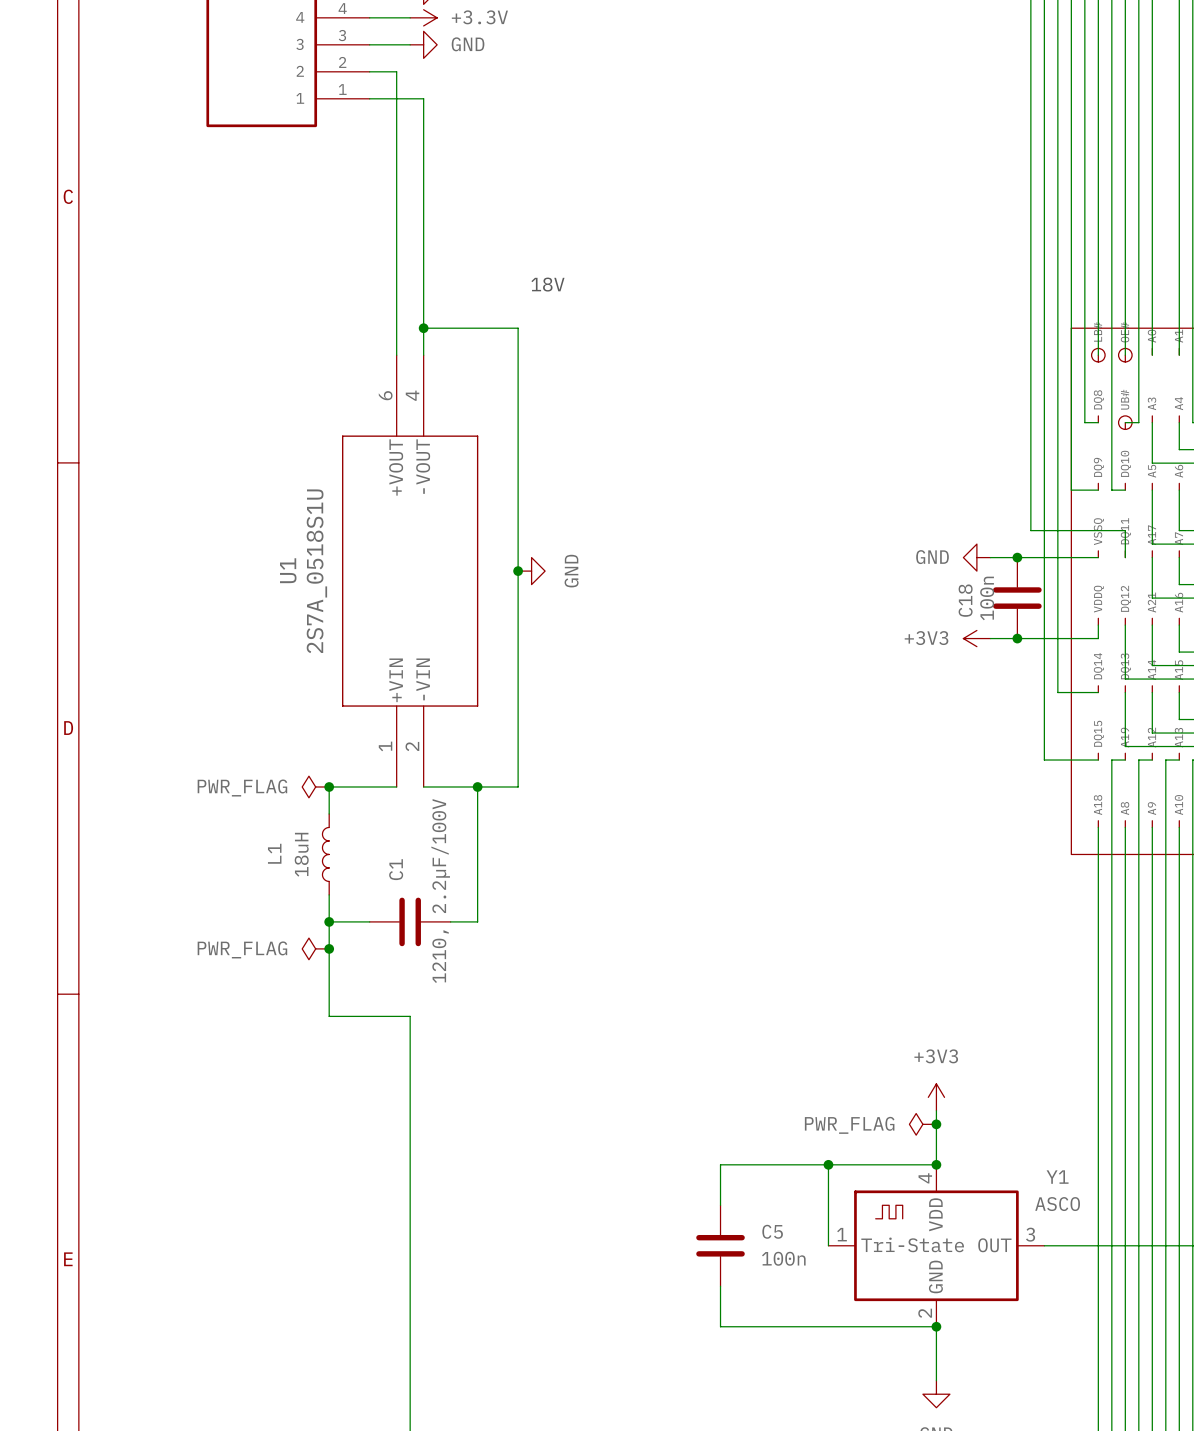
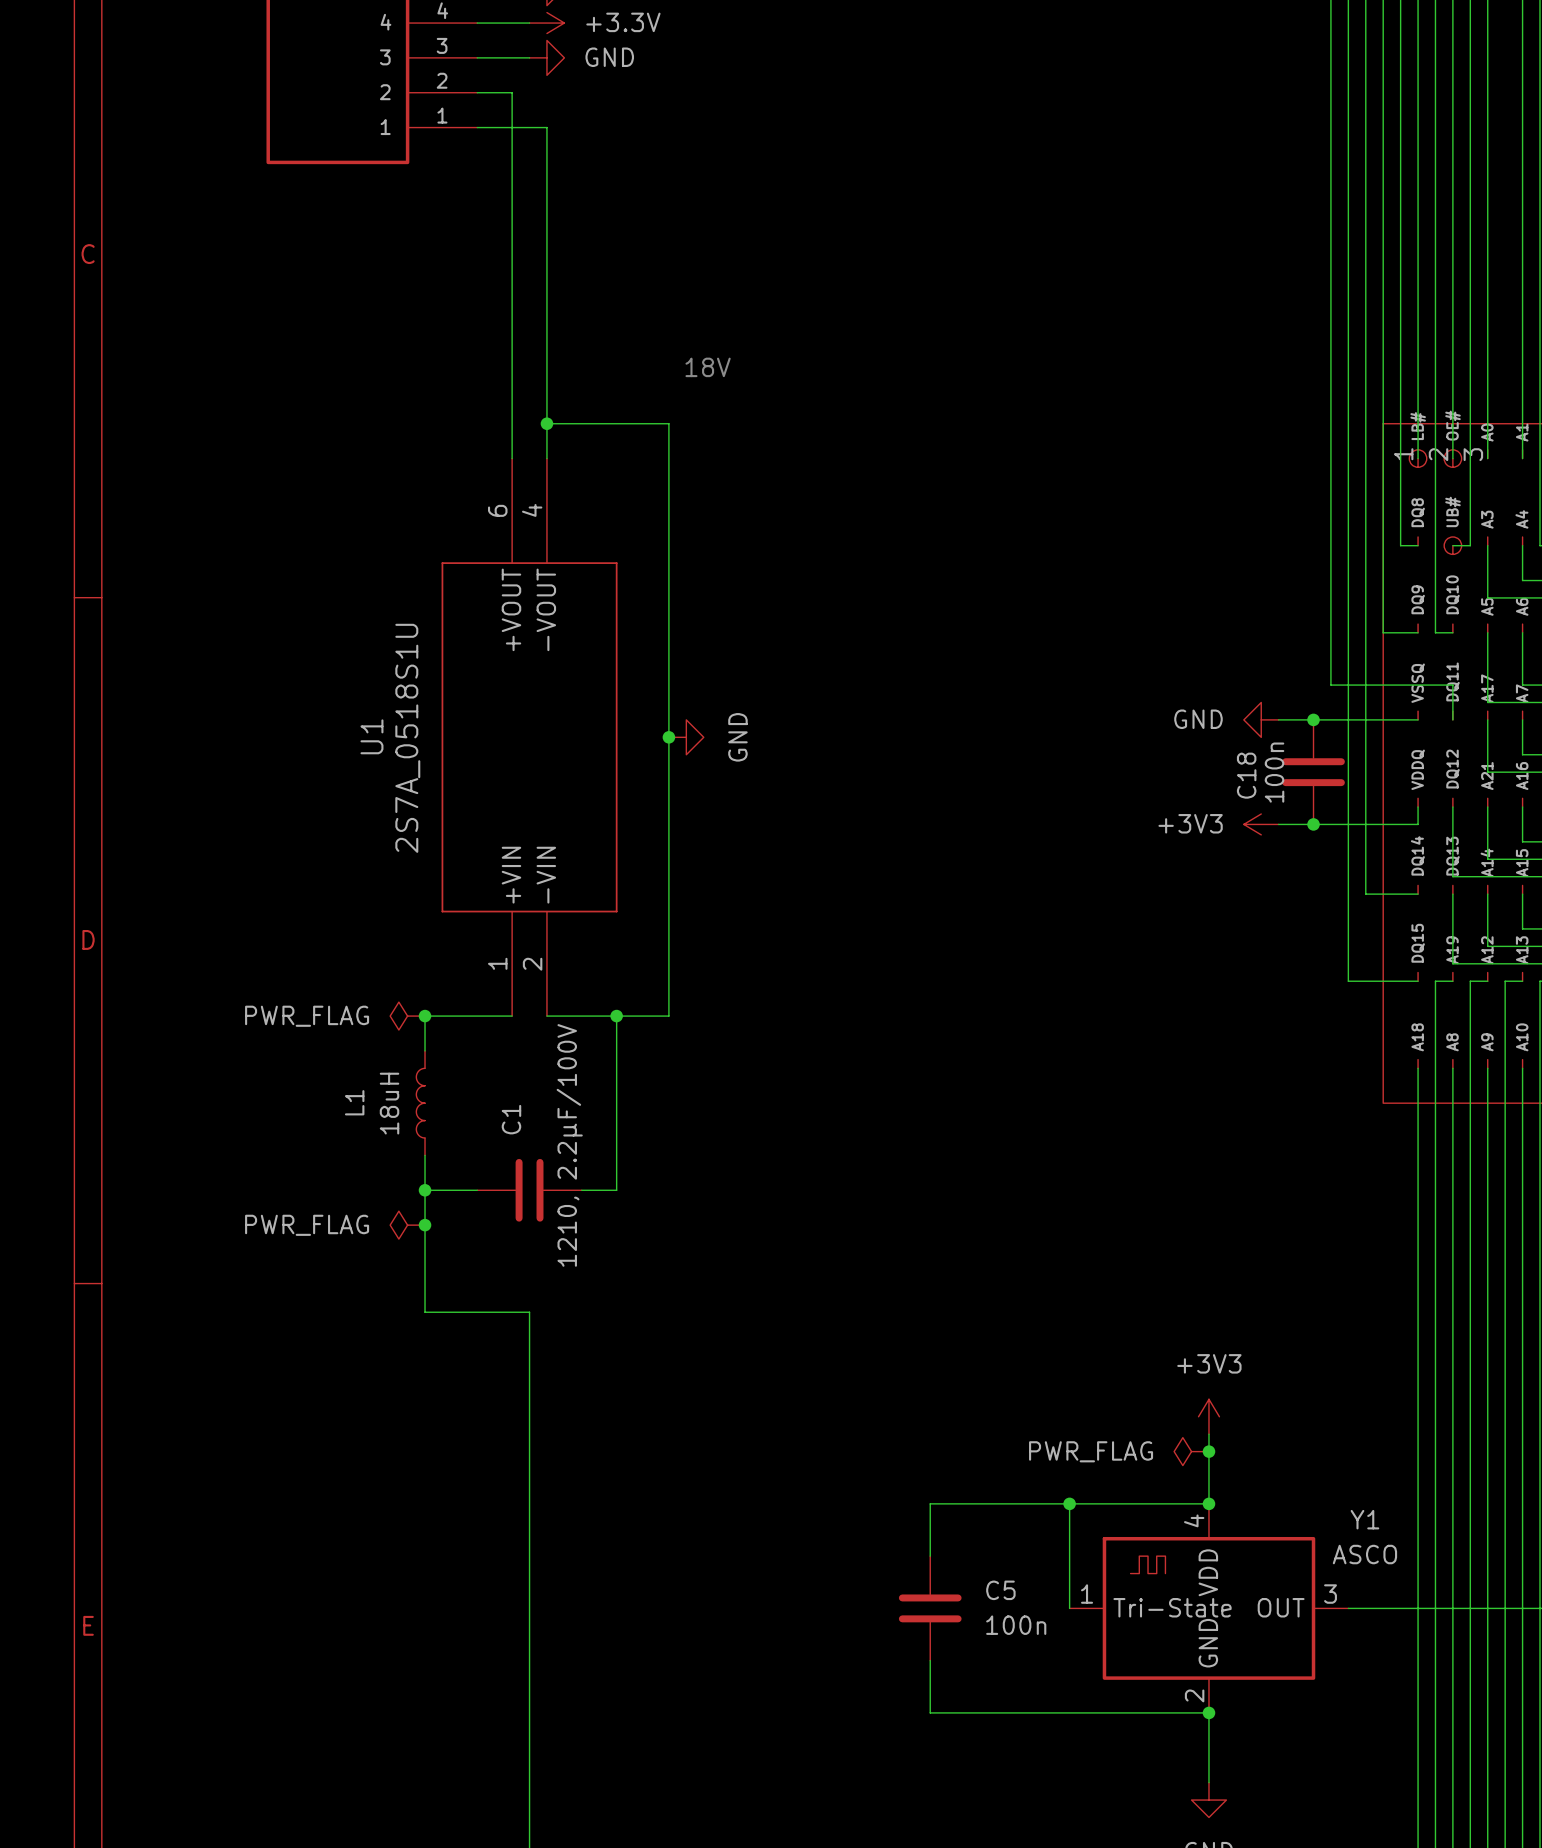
part pin number: none -> 1 (1403, 454)
part pin number: none -> 2 (1438, 454)
part pin number: none -> 3 (1473, 454)

